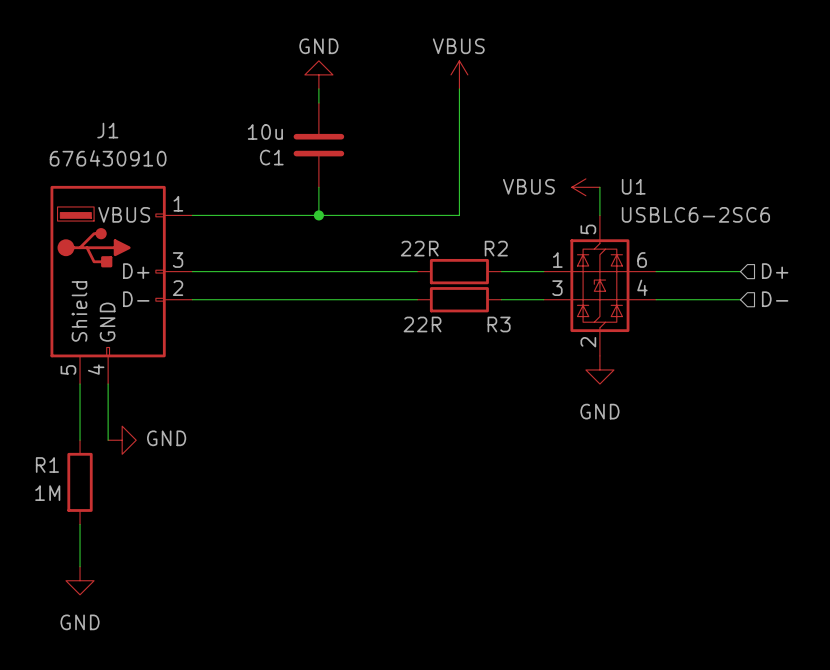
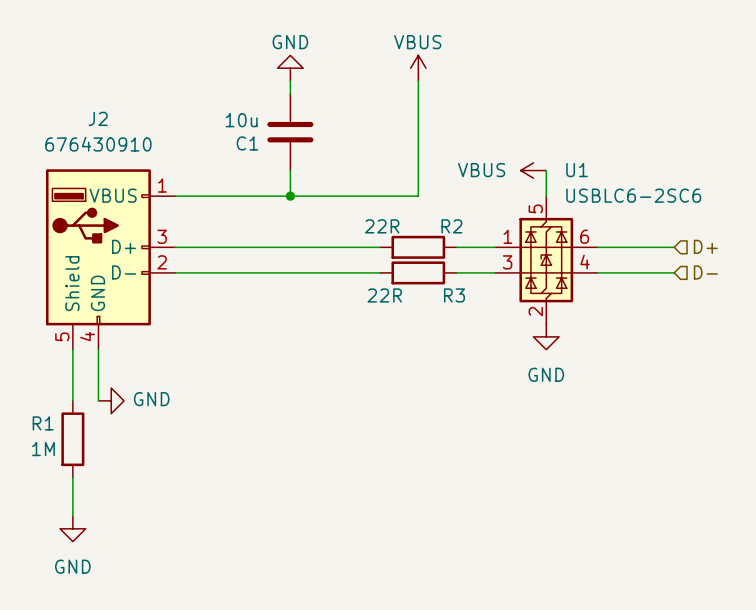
J1 name: J1 (107, 130) -> J2 (98, 118)

